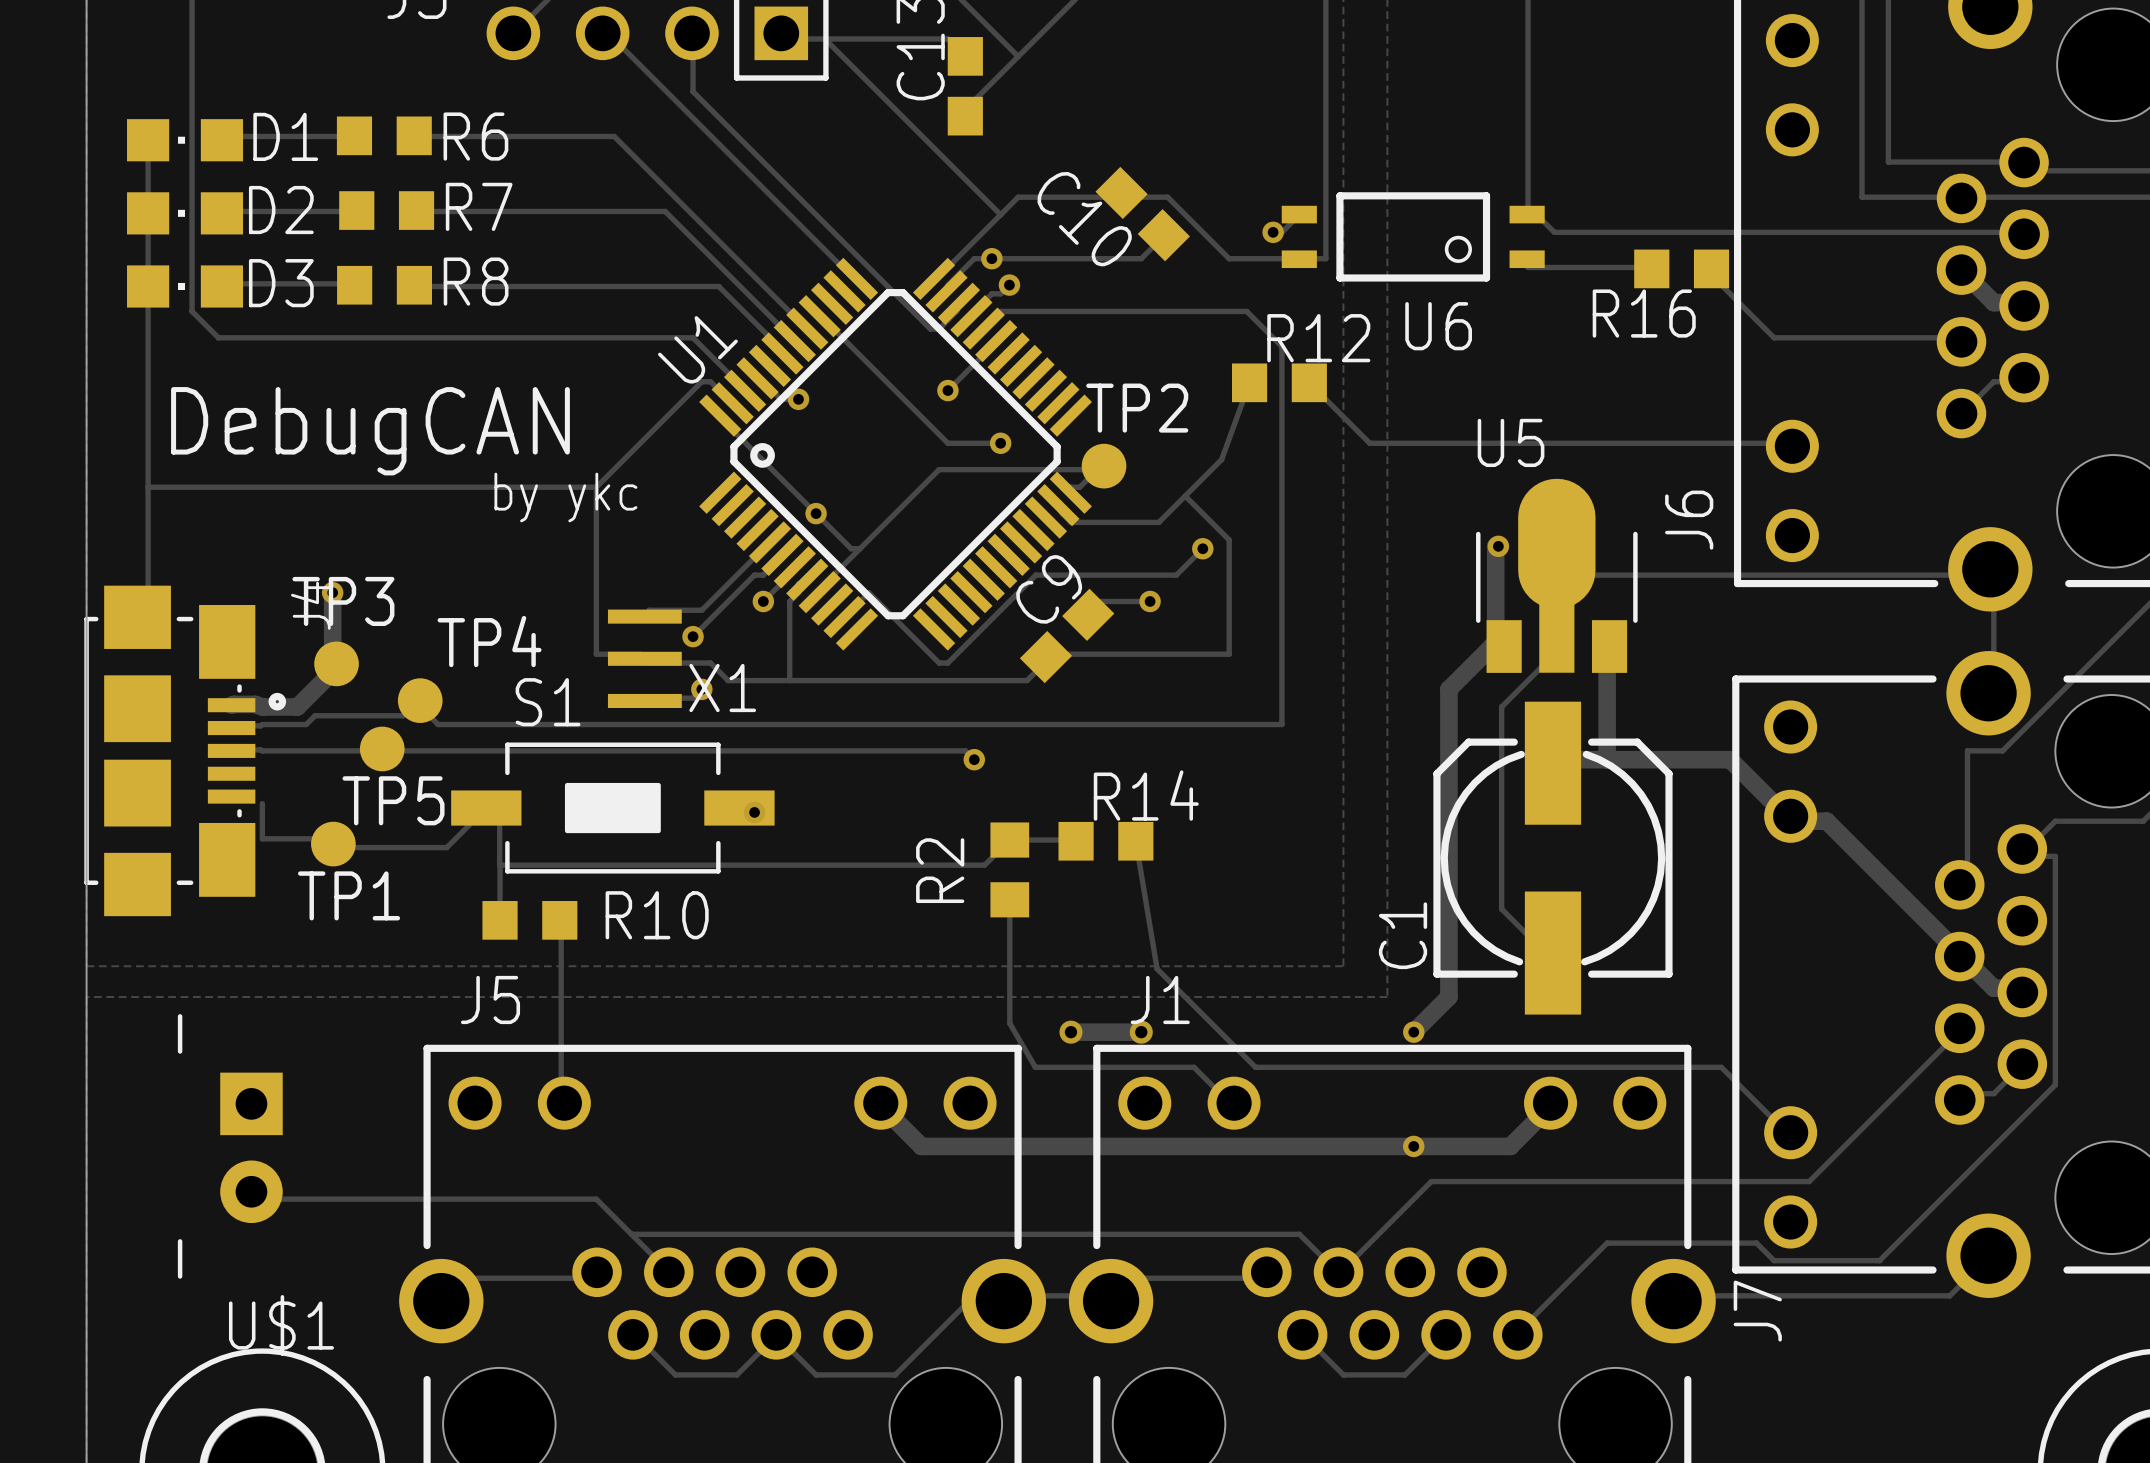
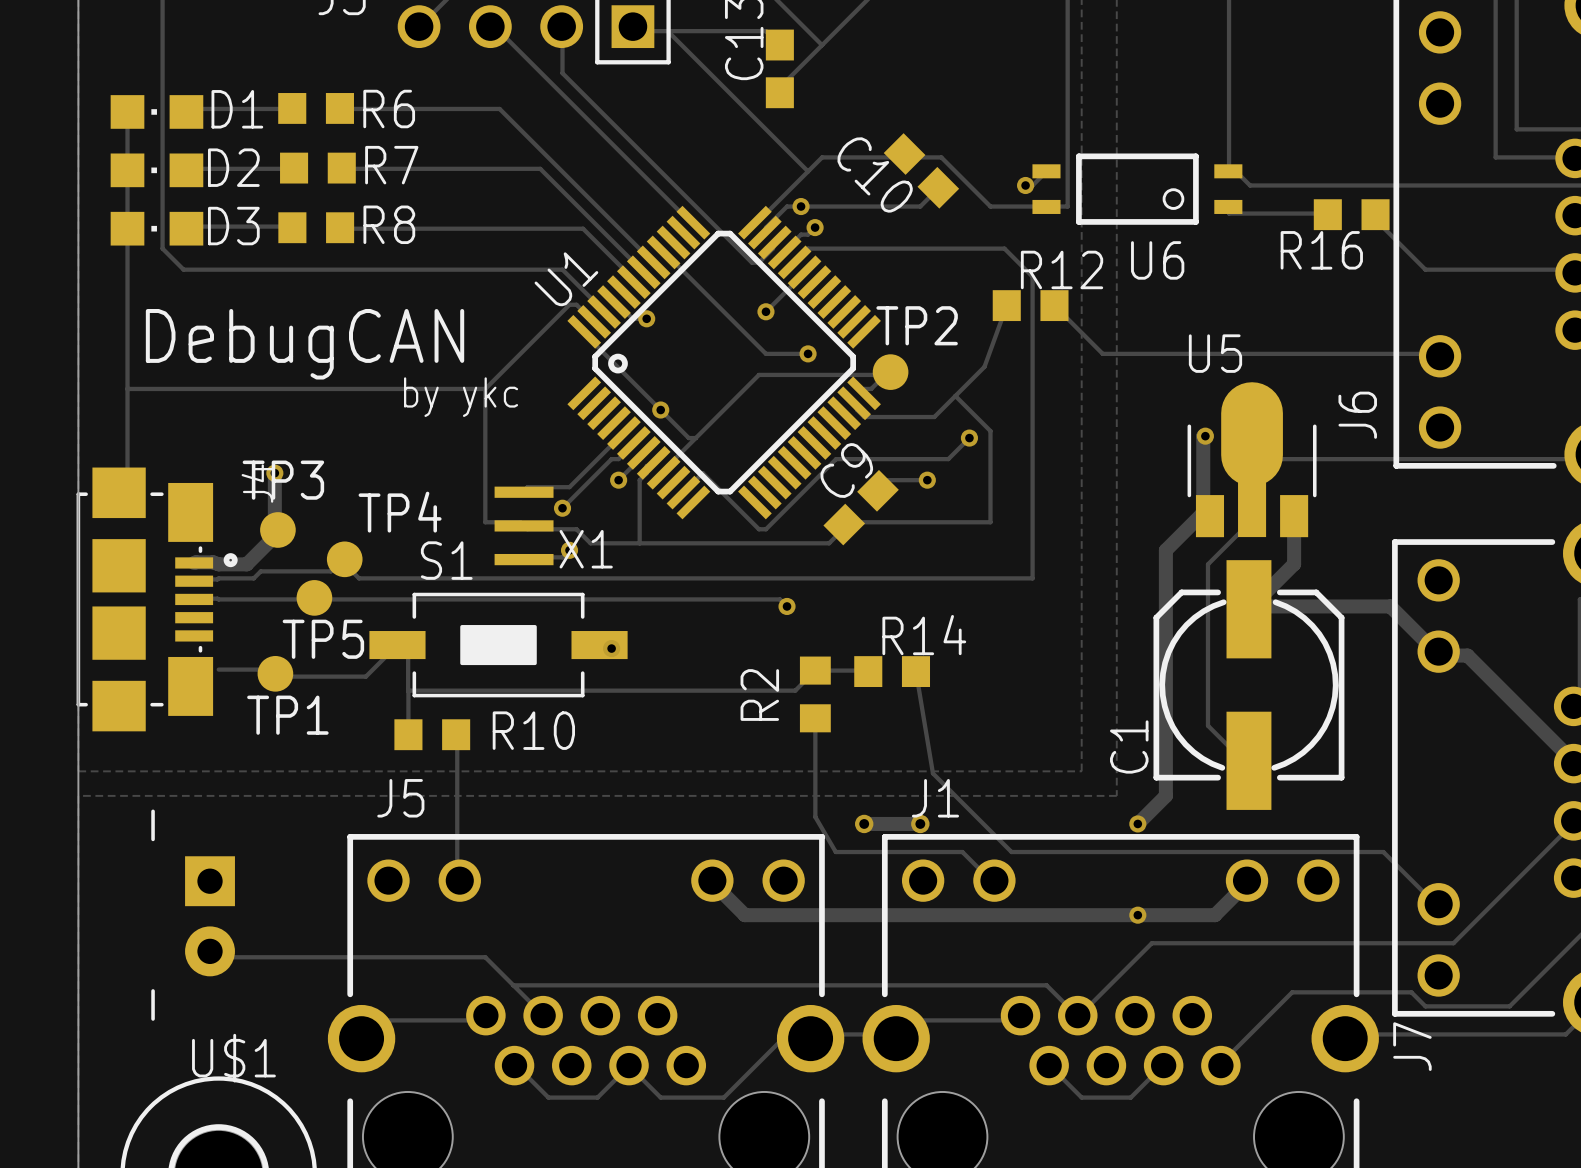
track: (1609, 646) (1607, 654) (1607, 759) -> (1294, 516) (1294, 564) (1248, 609)
track: (262, 803) (262, 838) -> none

